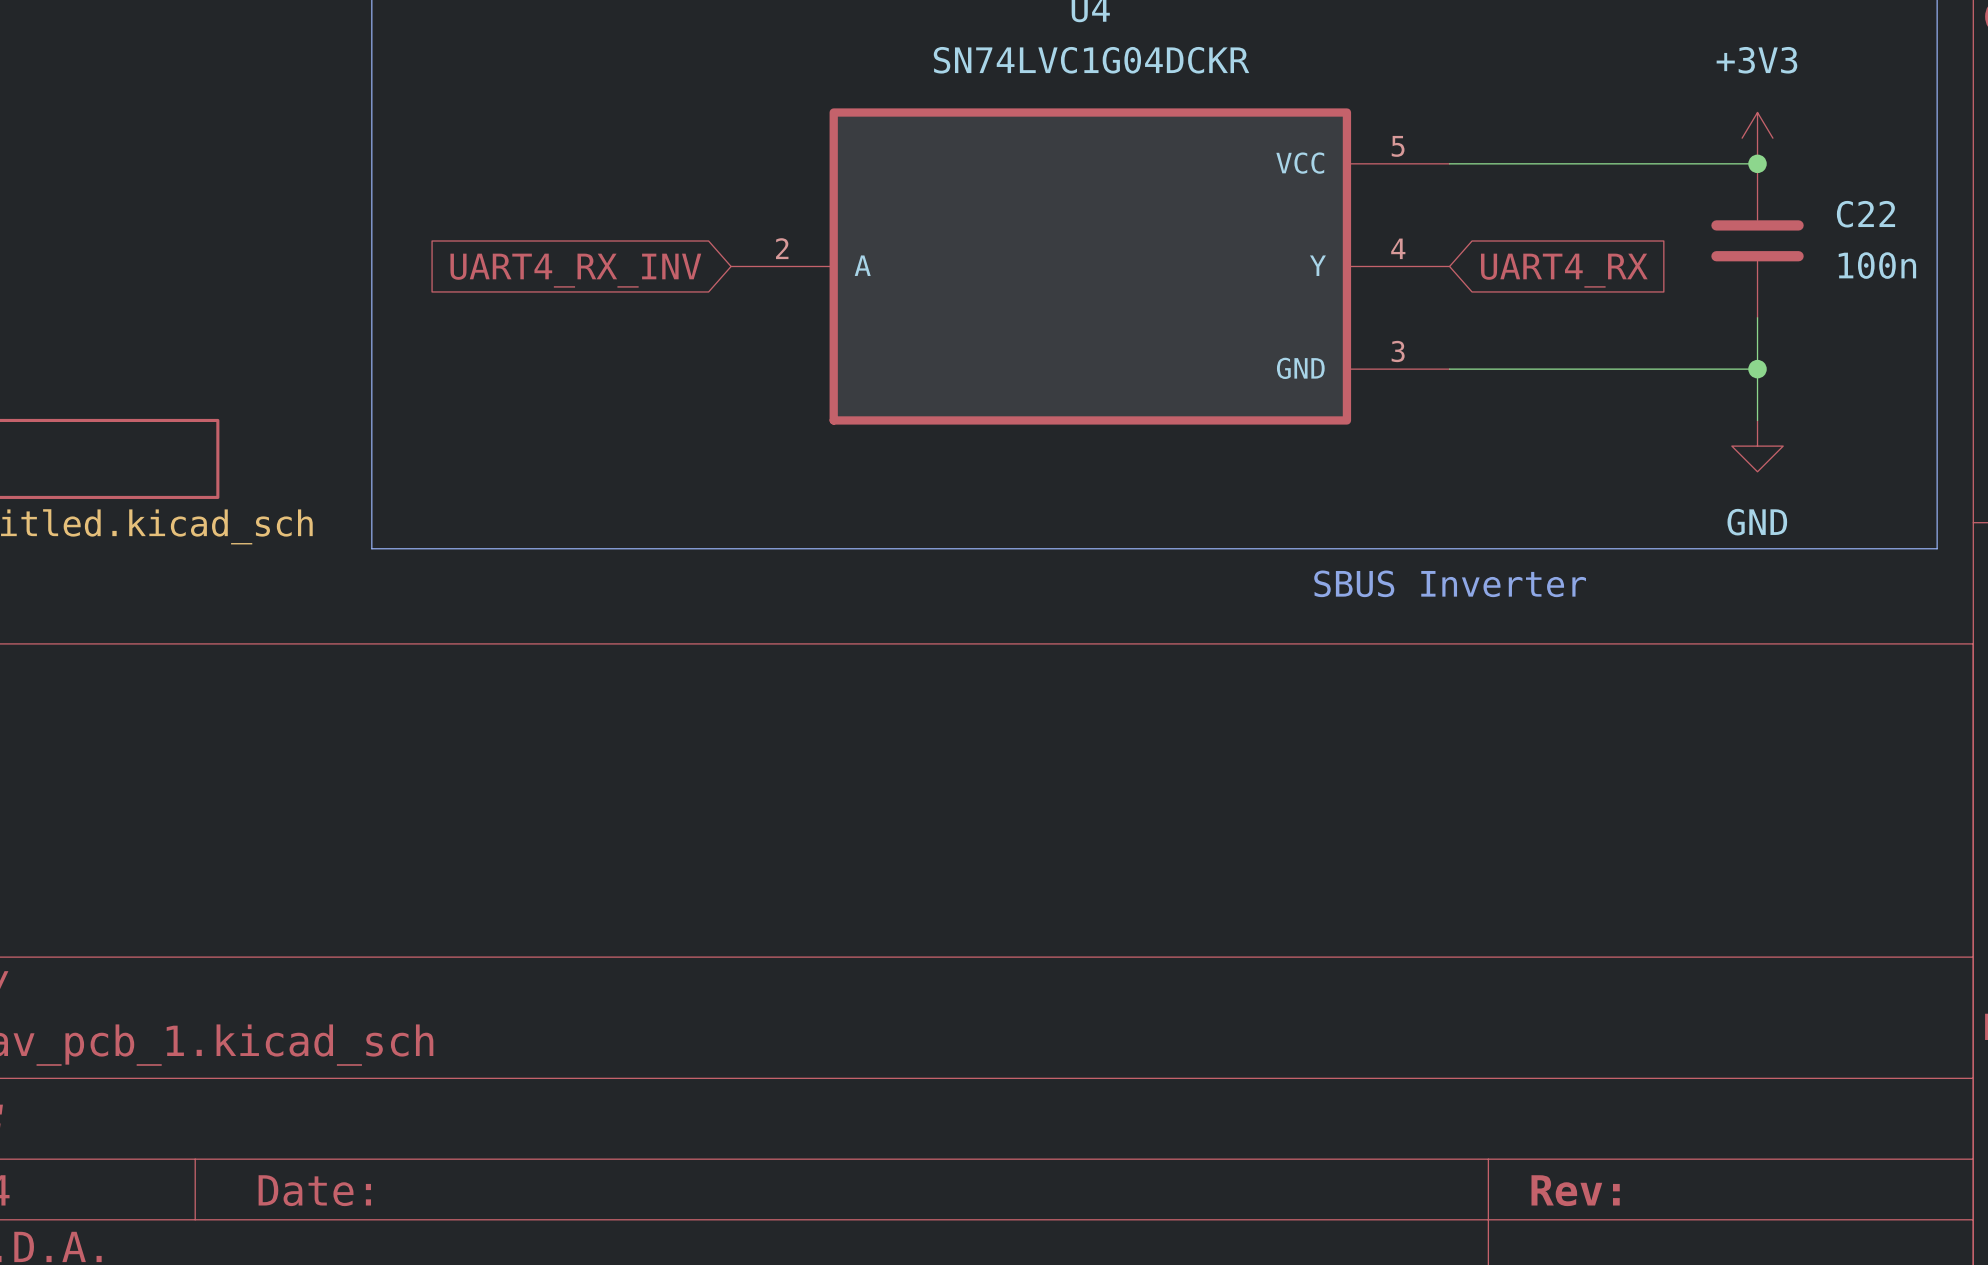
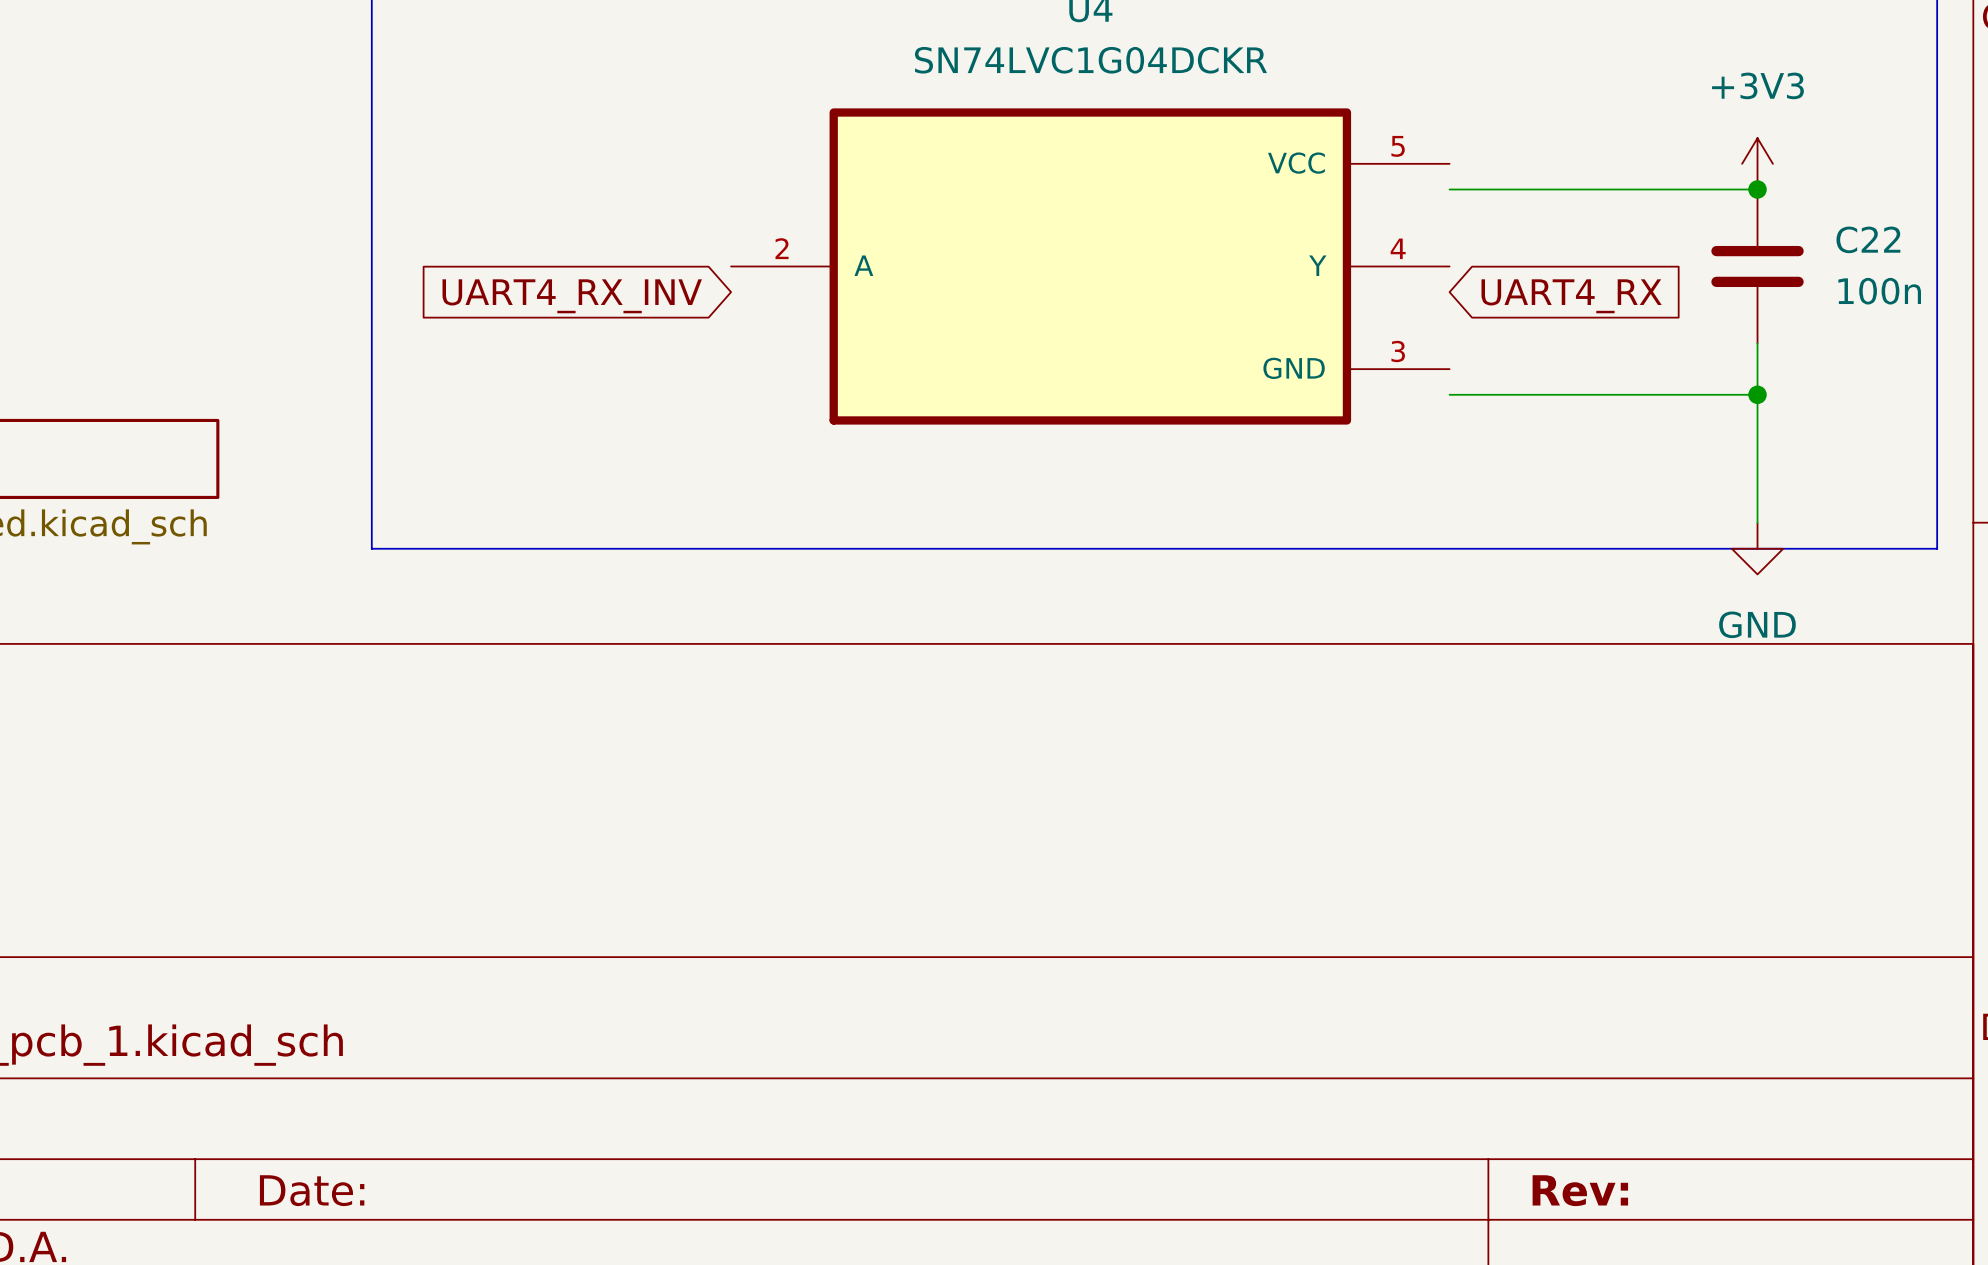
power symbol position: +3V3 (1757, 138) -> +3V3 (1757, 163)
wire: (1449, 163) (1757, 163) -> (1449, 189) (1757, 189)
junction position: (1757, 163) -> (1757, 189)
C22 position: (1757, 240) -> (1757, 266)
global label position: UART4_RX_INV (575, 270) -> UART4_RX_INV (572, 296)
global label position: UART4_RX (1564, 270) -> UART4_RX (1571, 296)
wire: (1449, 369) (1757, 369) -> (1449, 394) (1757, 394)
junction position: (1757, 369) -> (1757, 394)
wire: none -> (1757, 420) (1757, 523)
power symbol position: GND (1757, 446) -> GND (1757, 548)
text: SBUS Inverter (1450, 583) -> none

